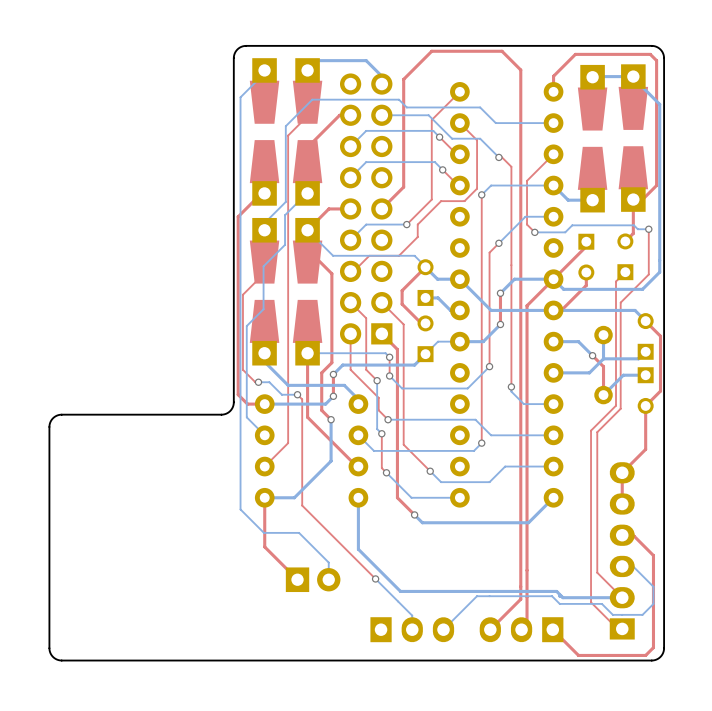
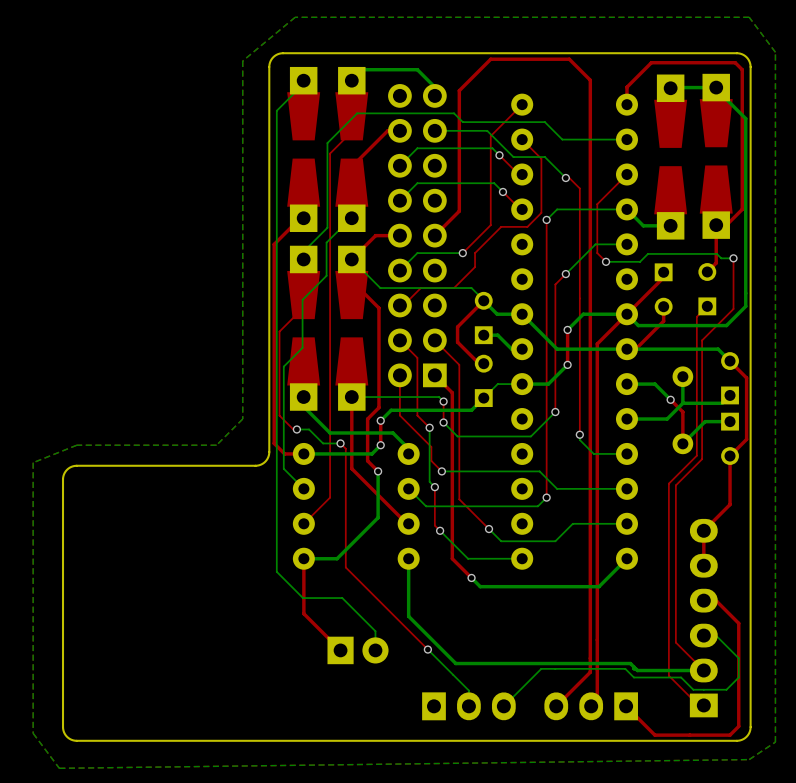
bottom zone outline: none -> (749, 17) (295, 17) (242, 60) (242, 419) (216, 445) (76, 445) (33, 462) (33, 733) (59, 768) (749, 759) (775, 742) (775, 52) (749, 17)

